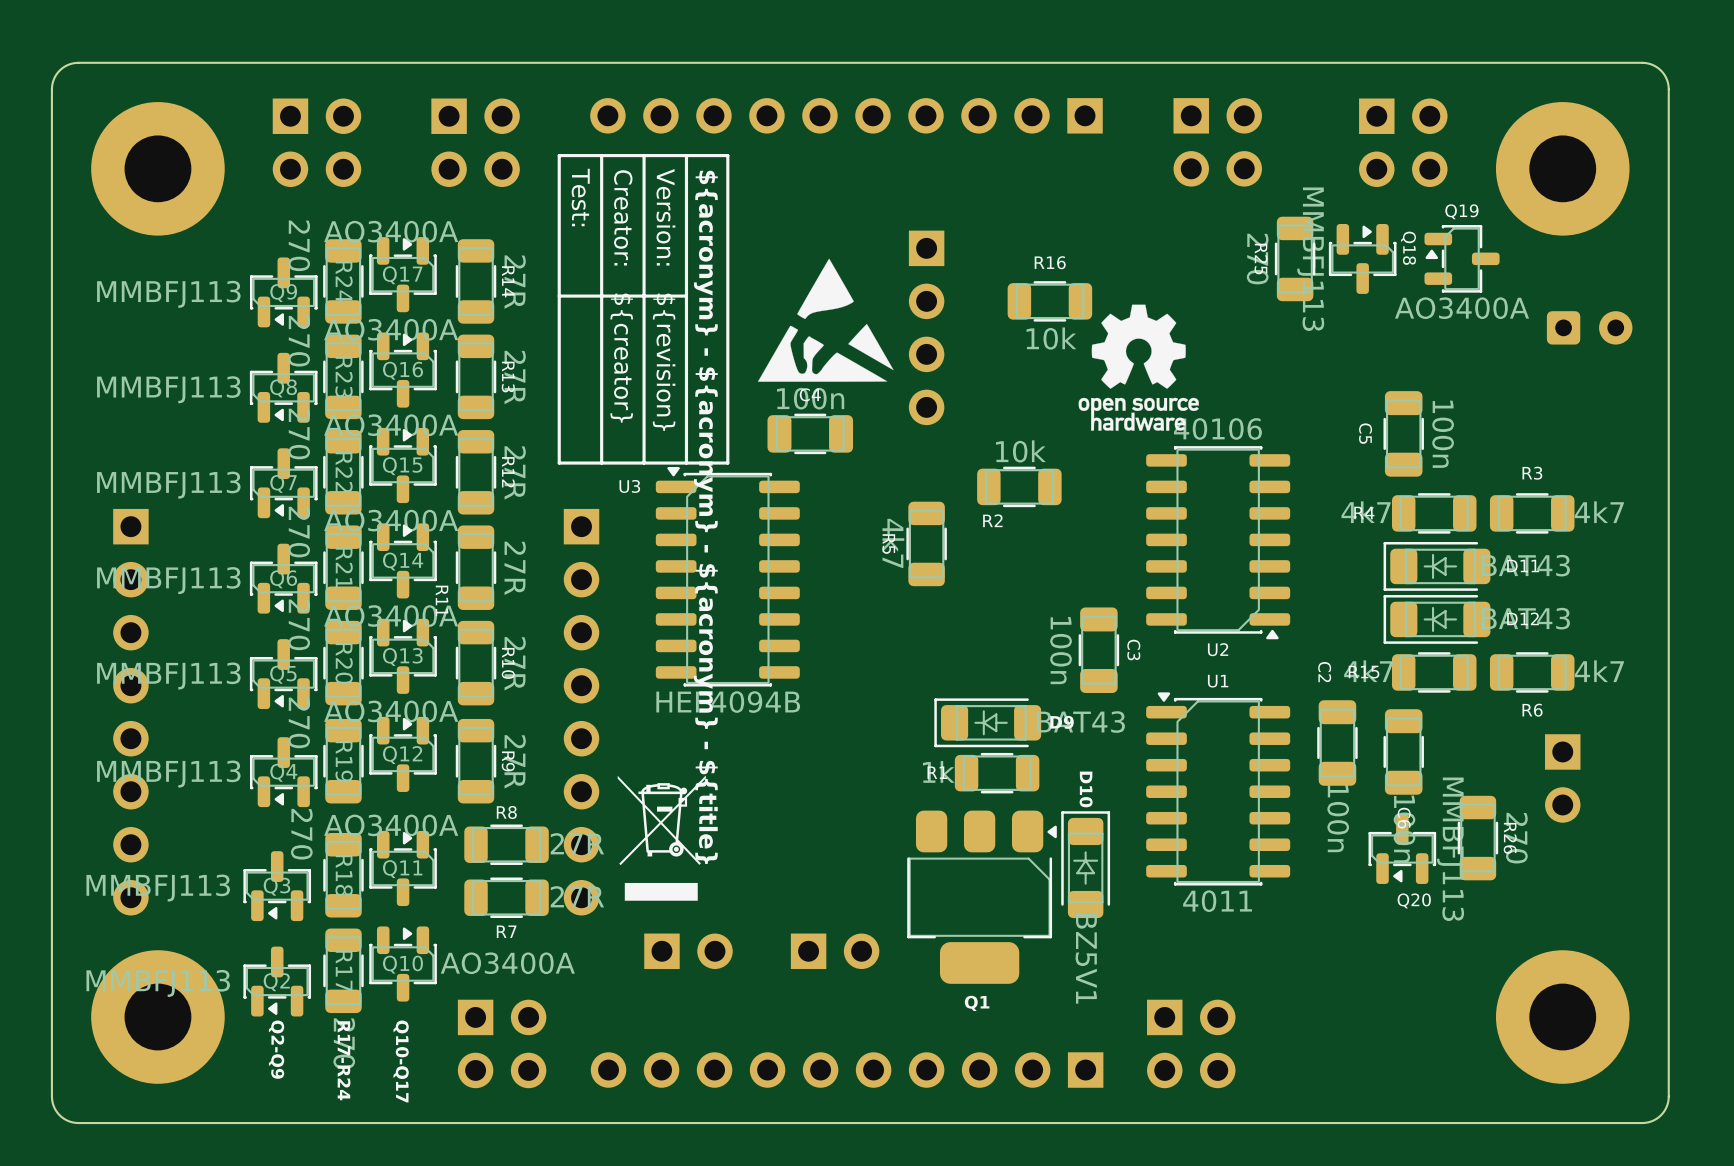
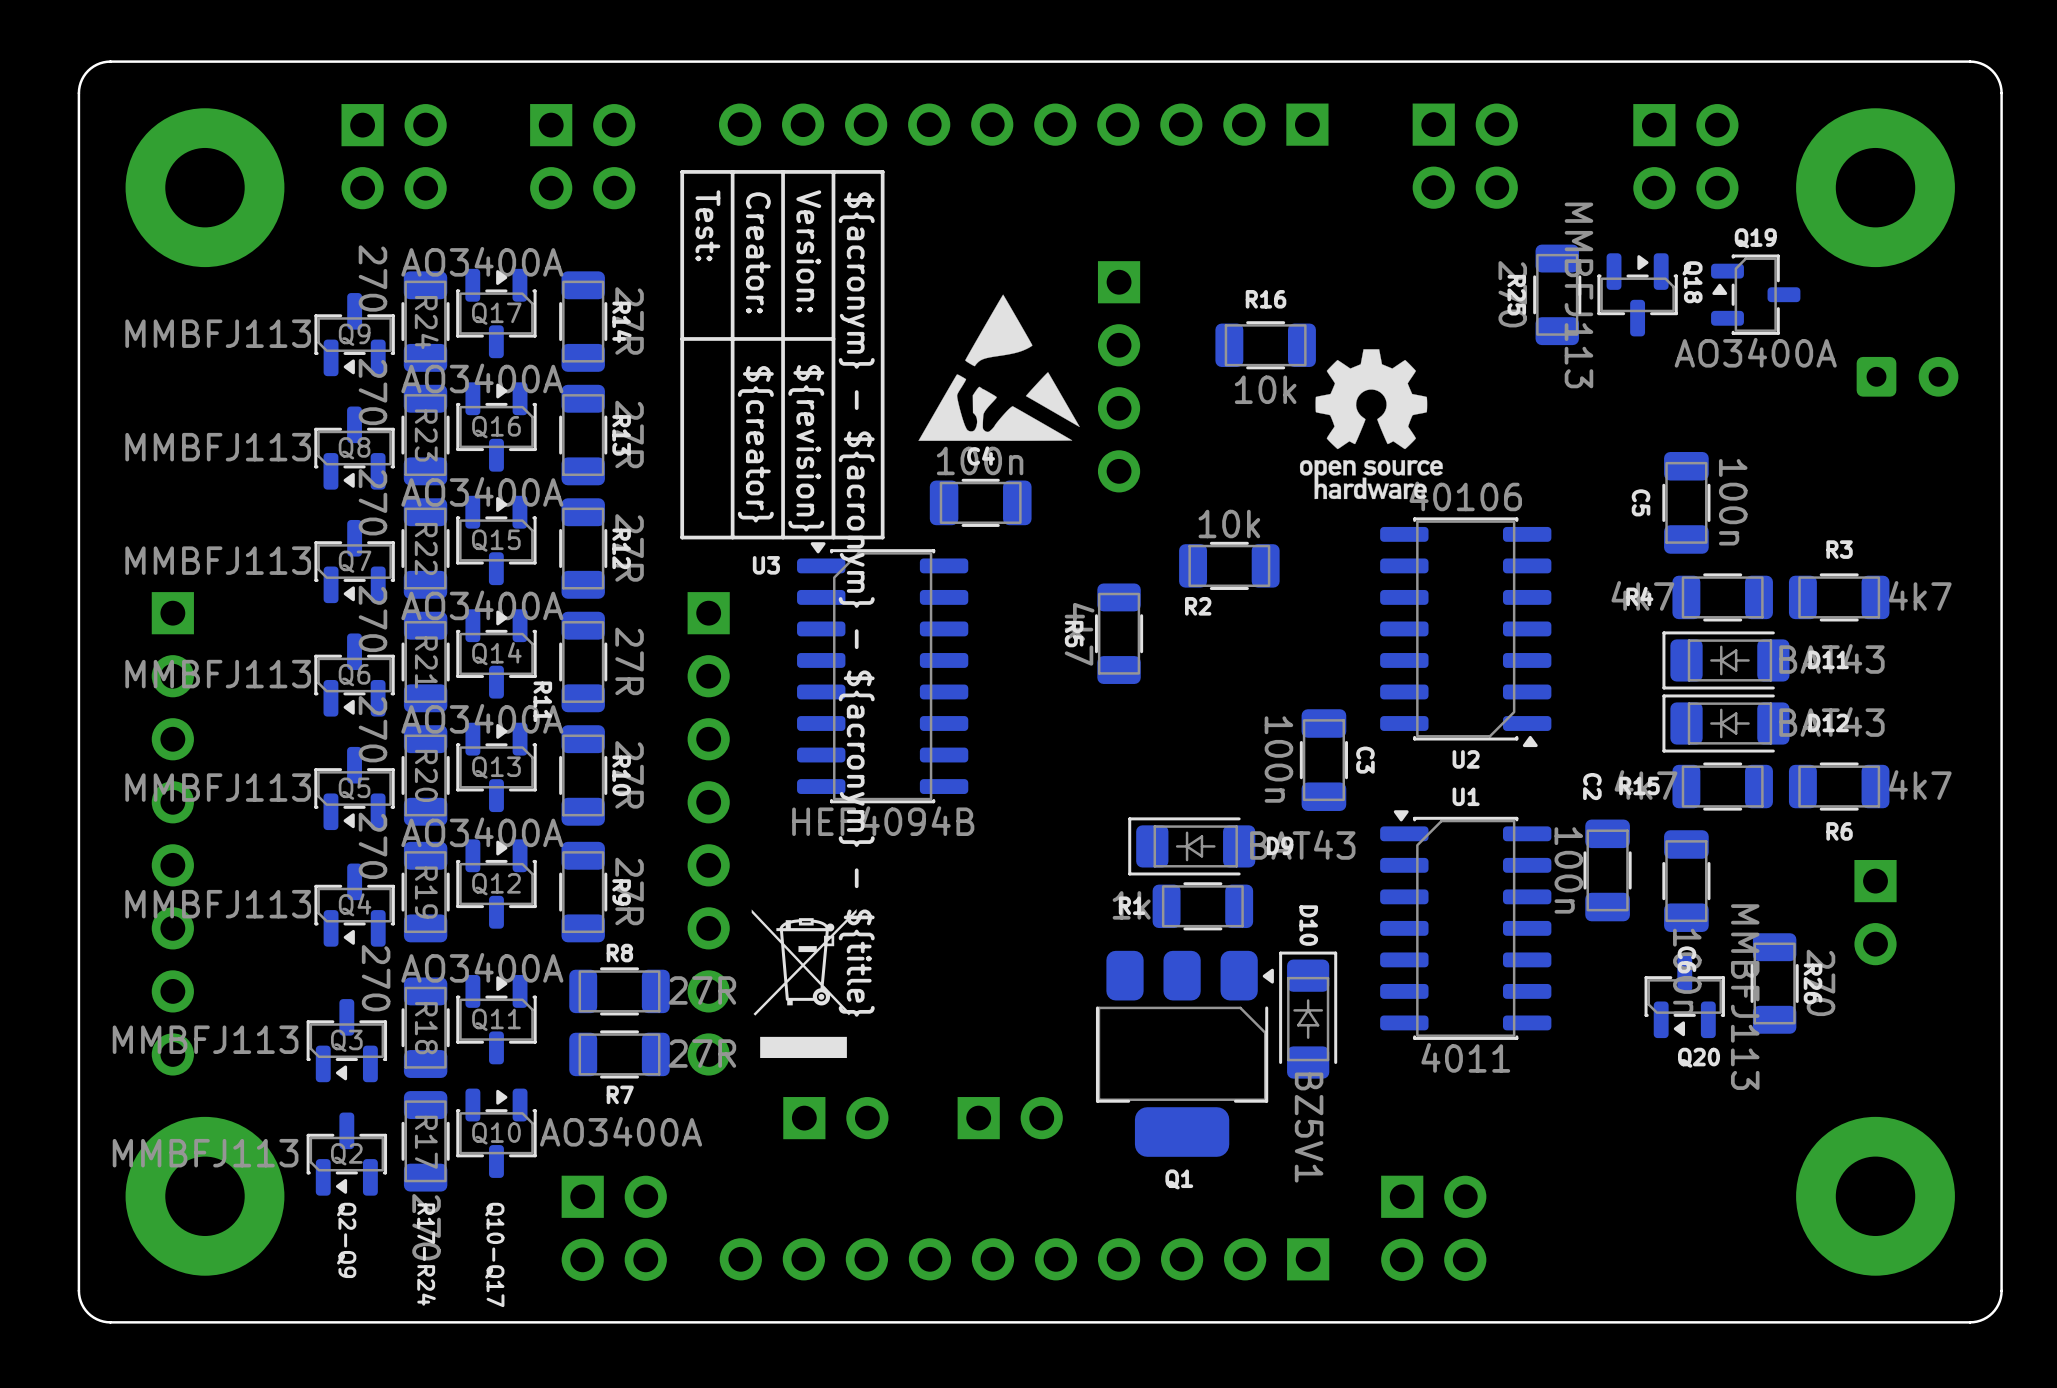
C2 value position: 100n (1338, 818) -> 100n (1568, 870)

